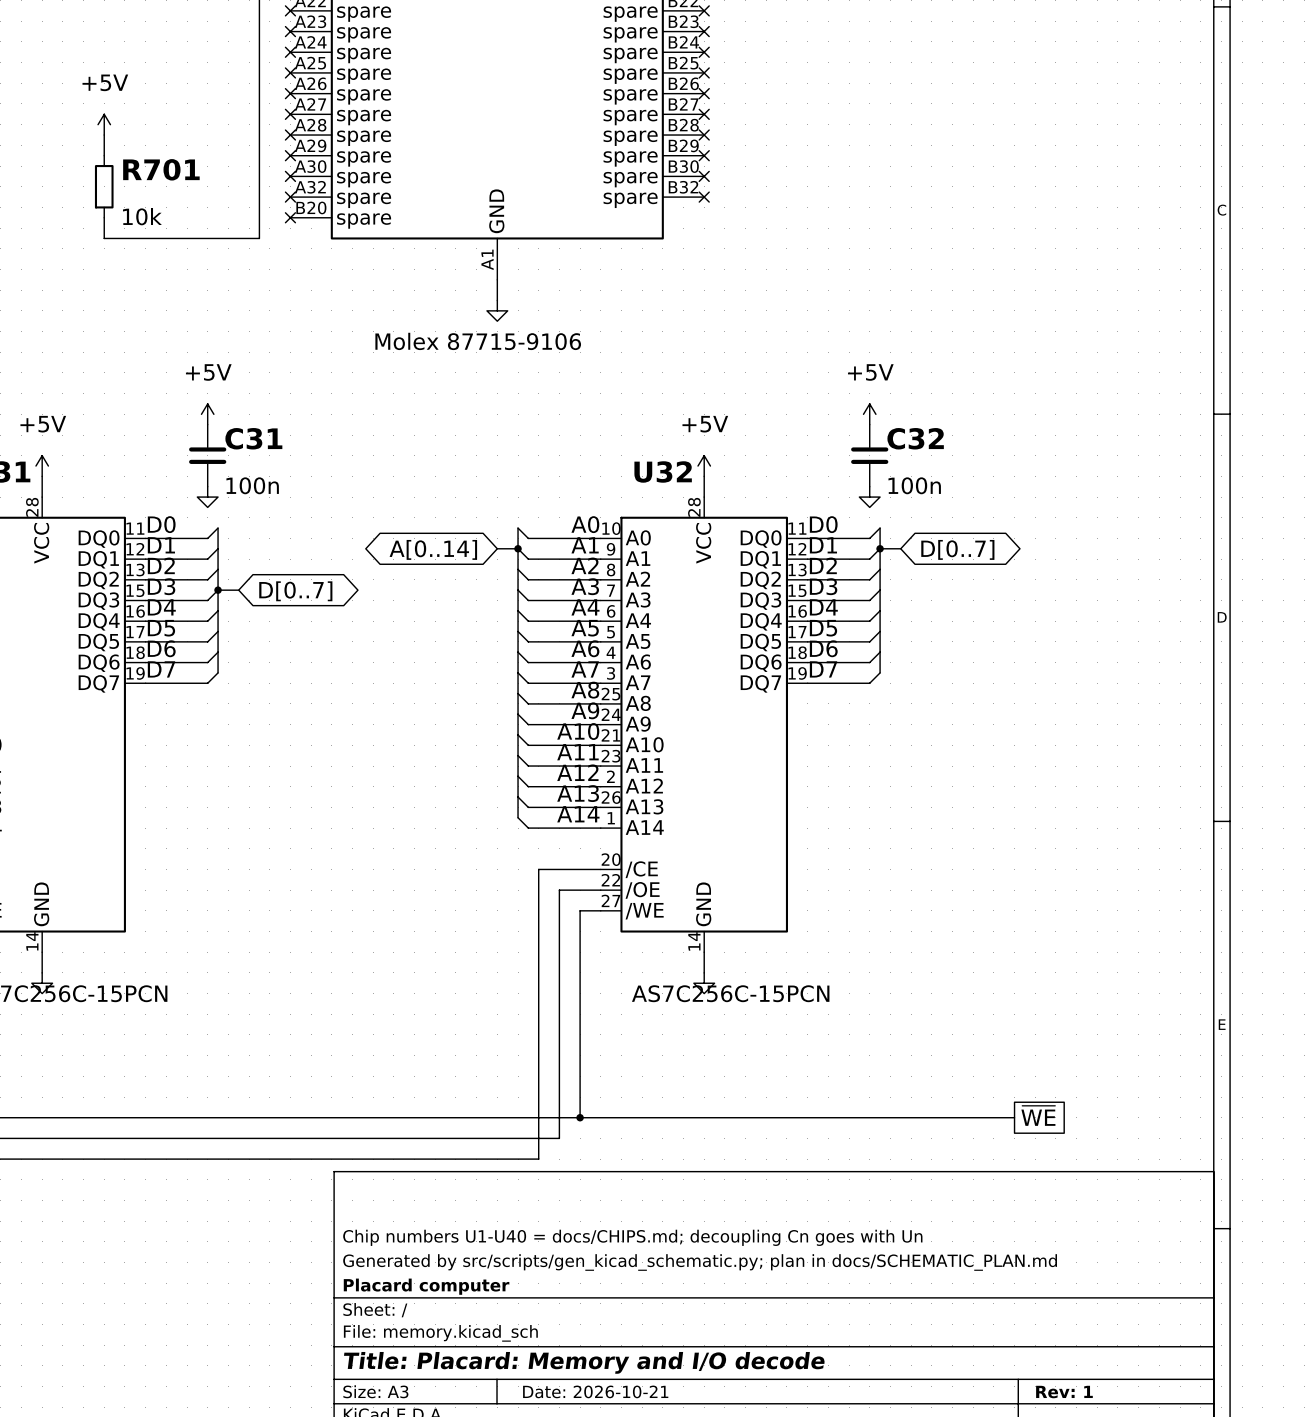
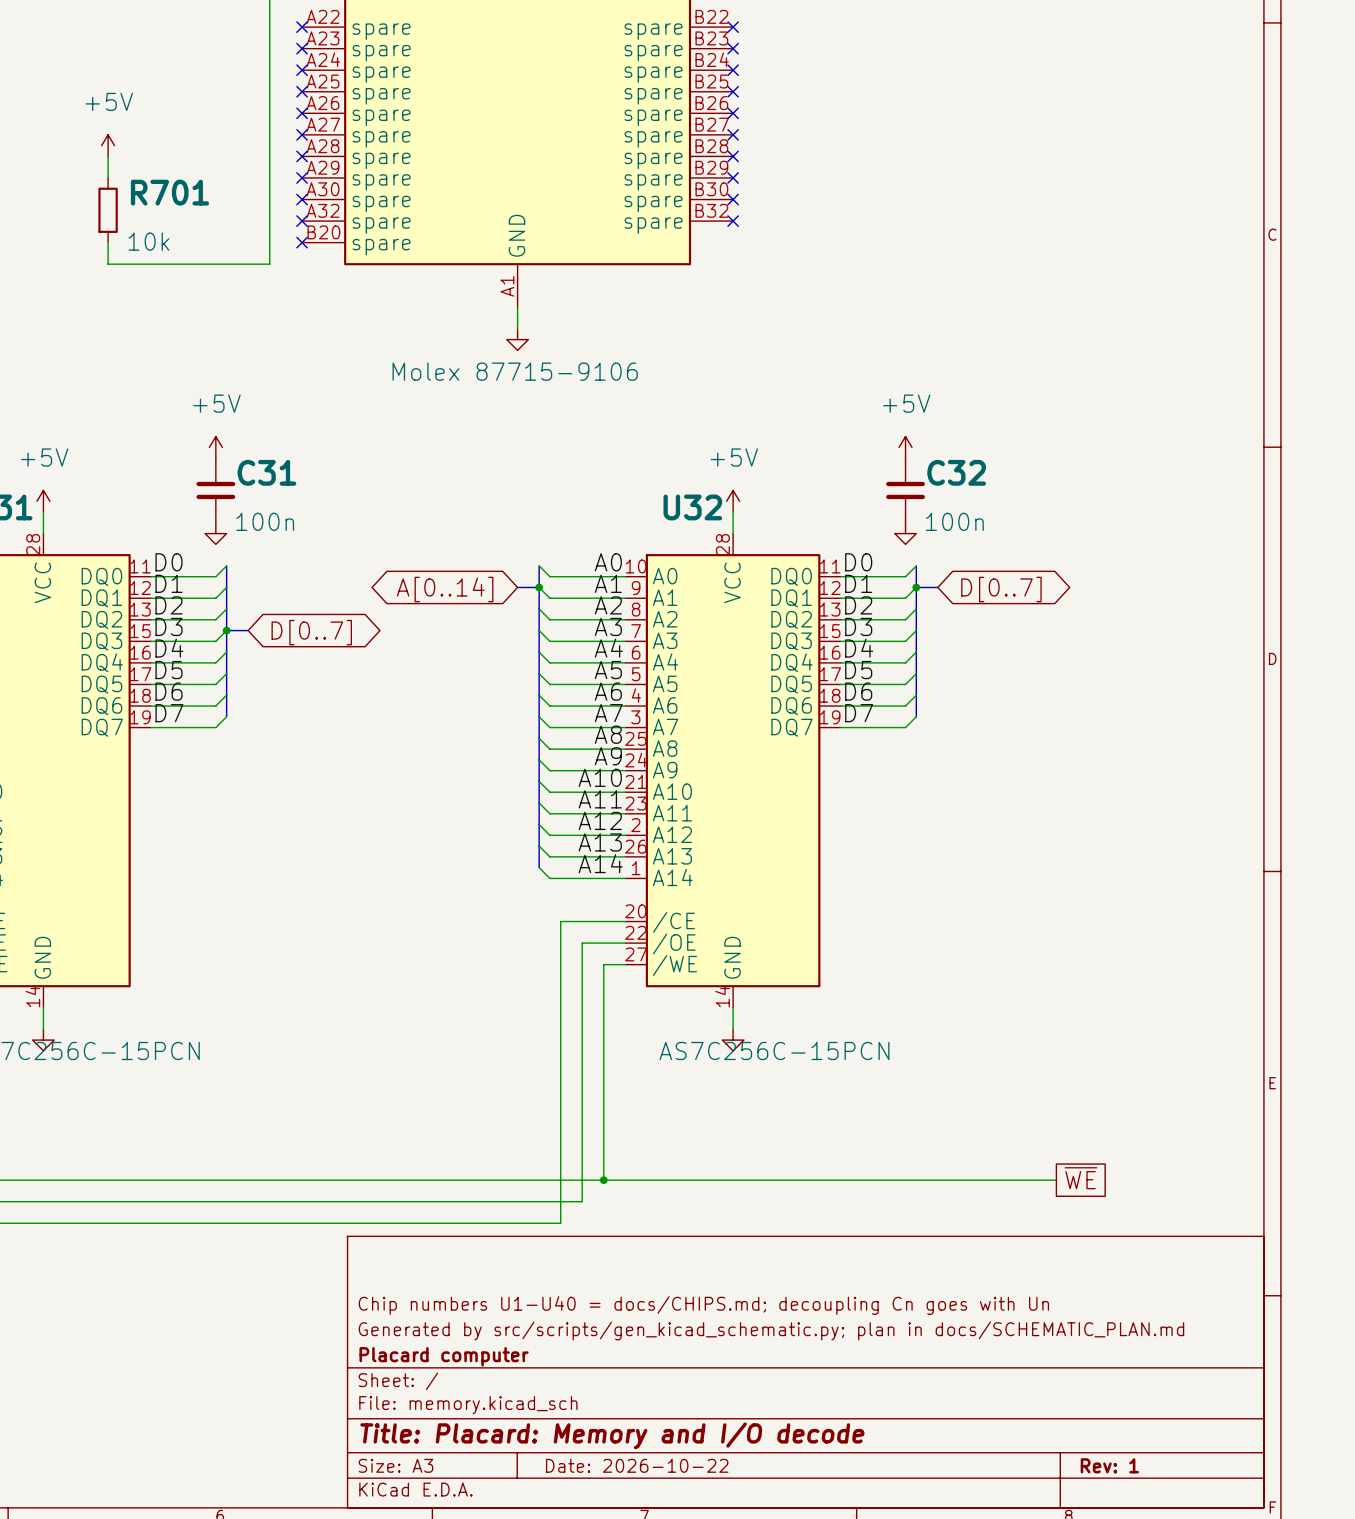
title block: Date: 2026-10-21 (595, 1391) -> Date: 2026-10-22 (637, 1465)

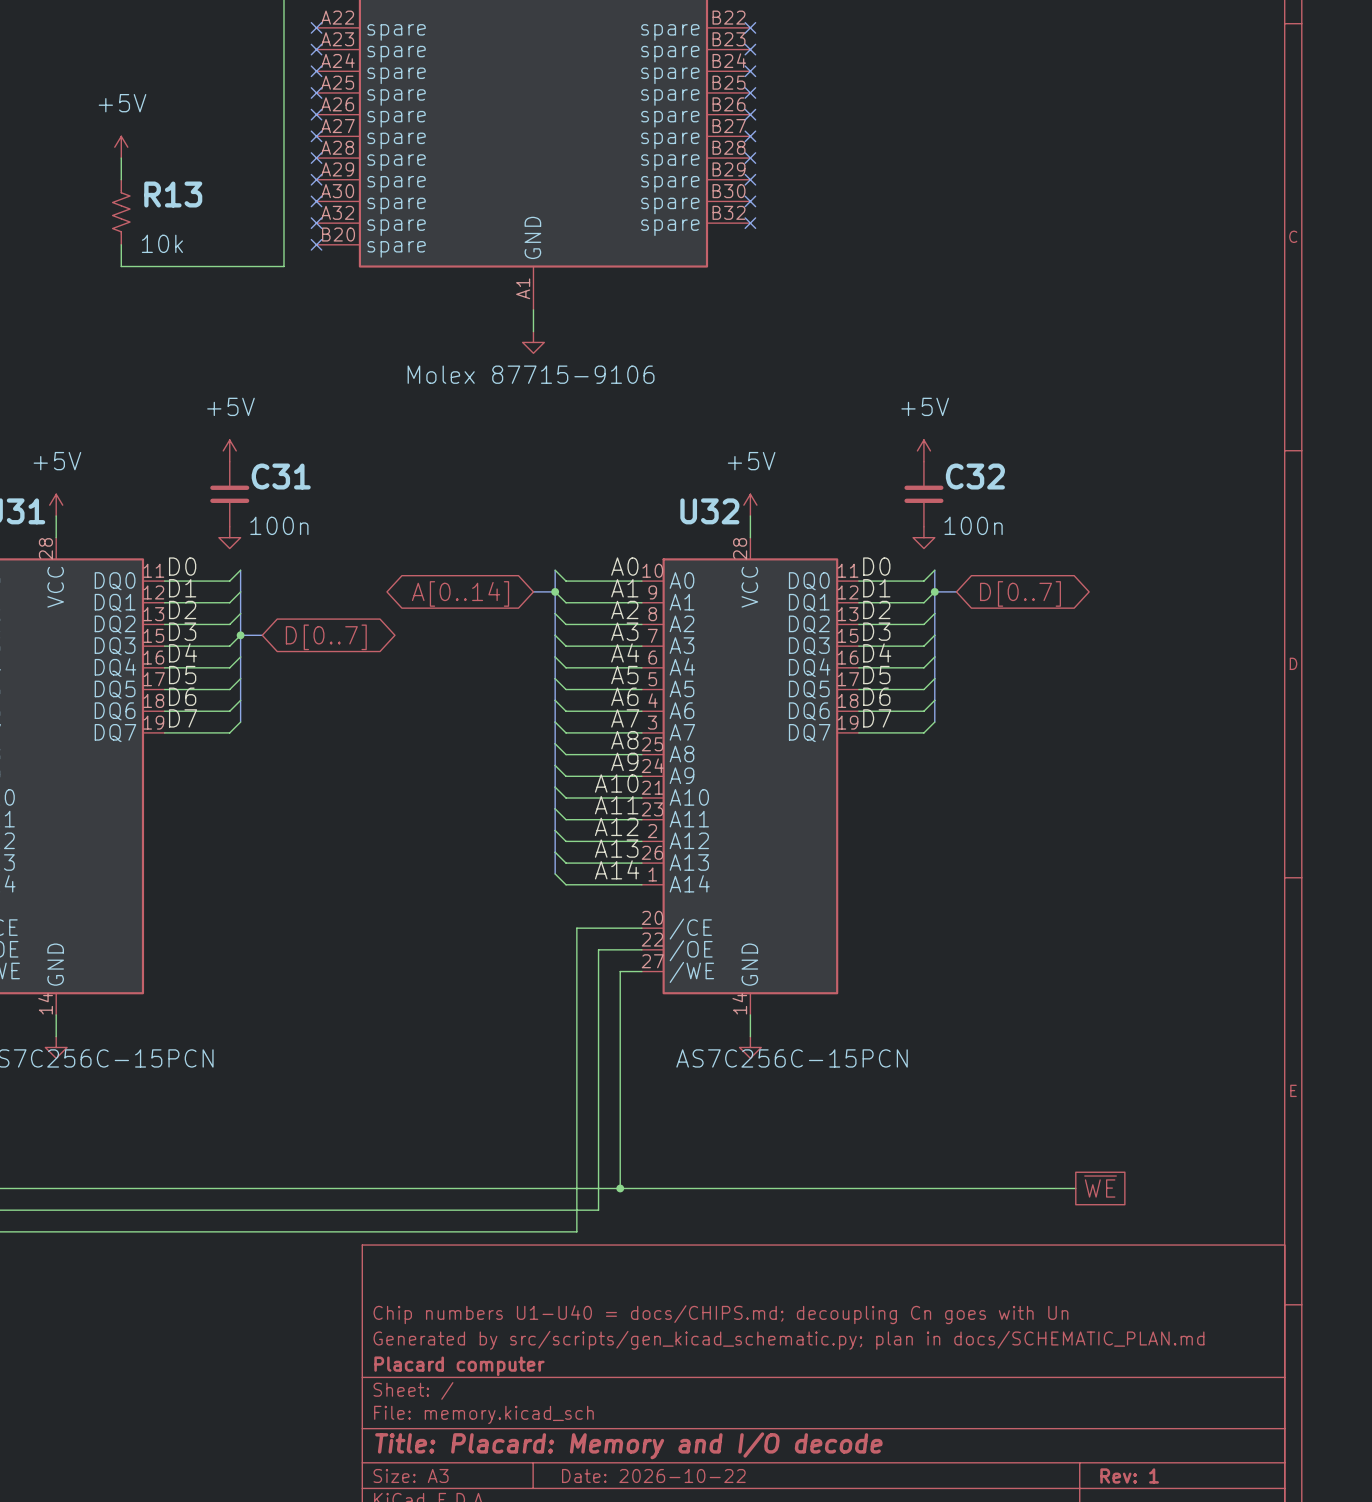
R701: 10k (108, 210) -> none
R13: none -> 10k (121, 212)

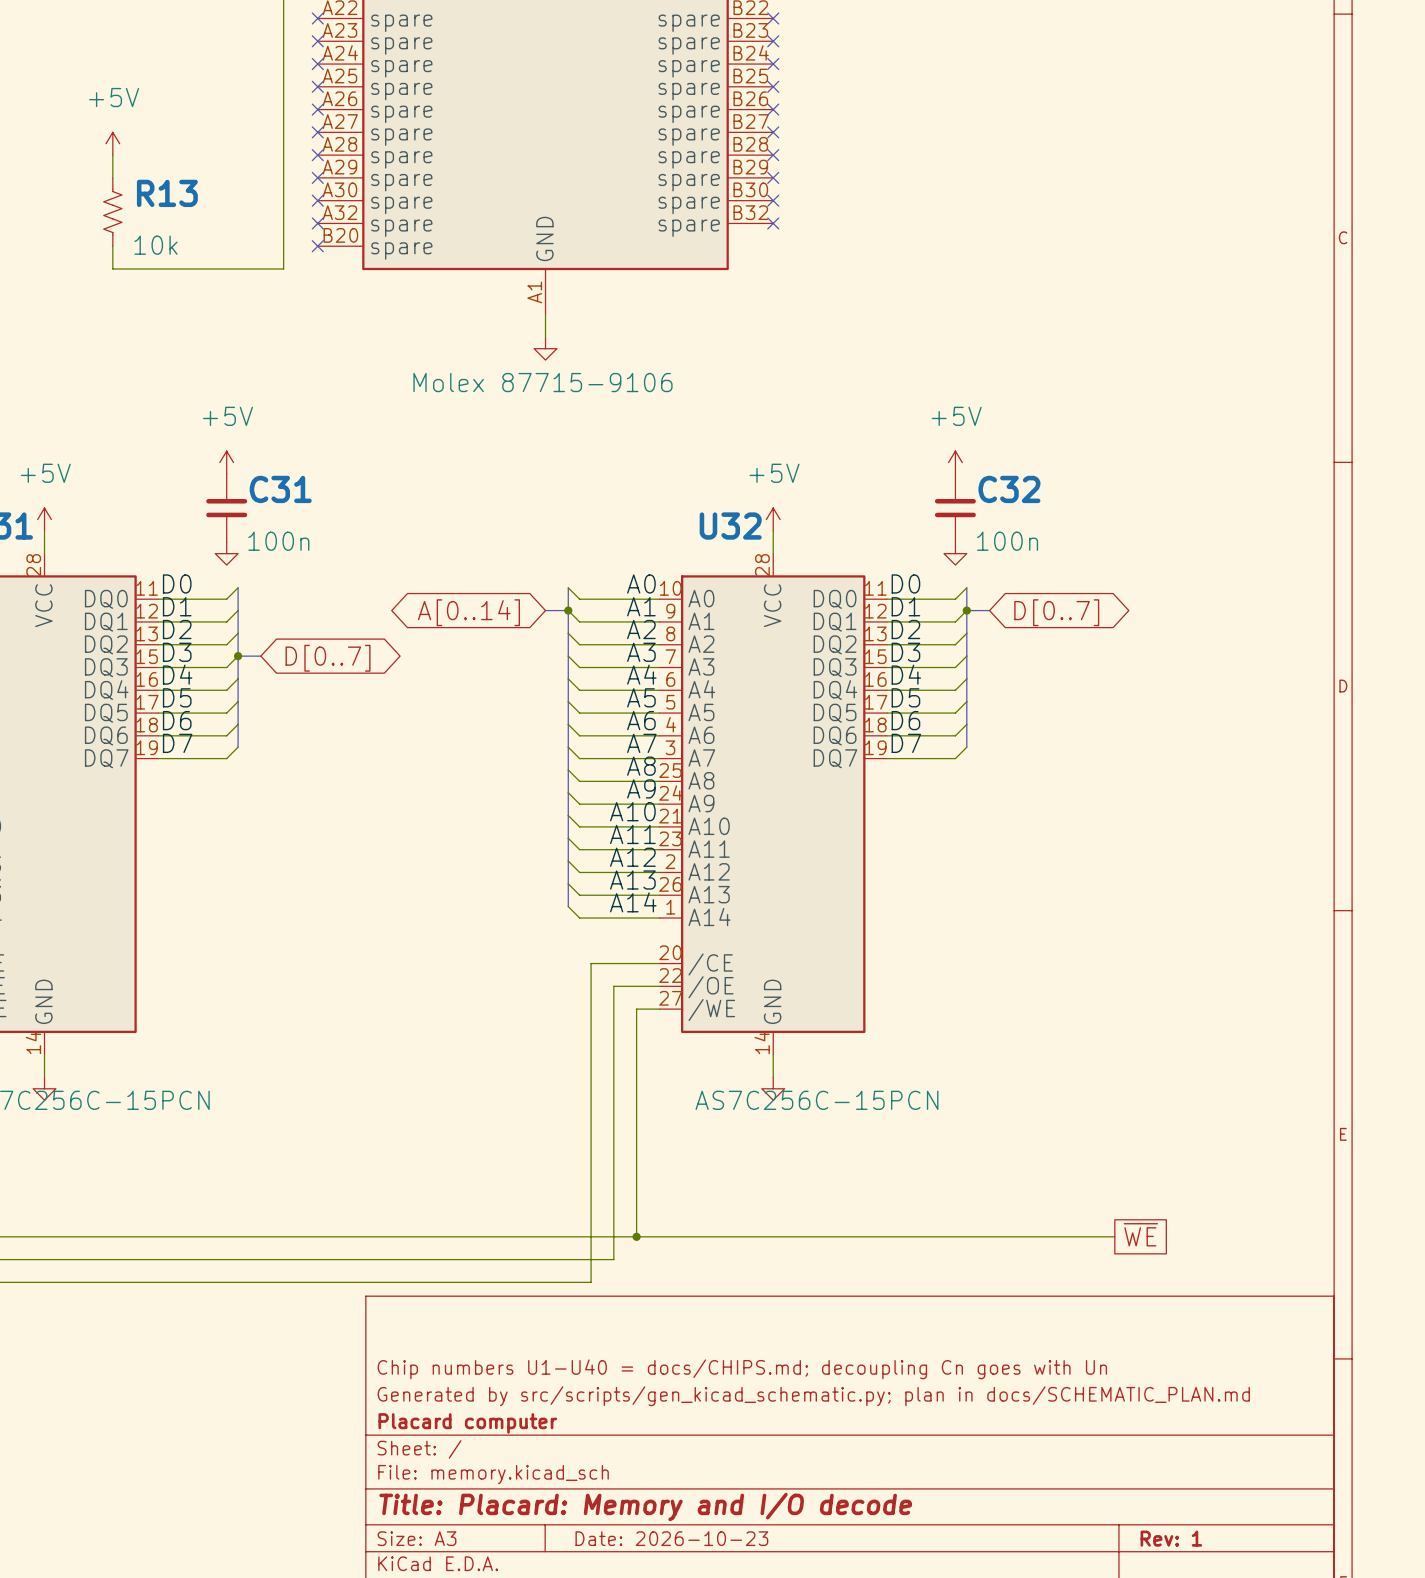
title block: Date: 2026-10-22 (653, 1475) -> Date: 2026-10-23 (671, 1538)

